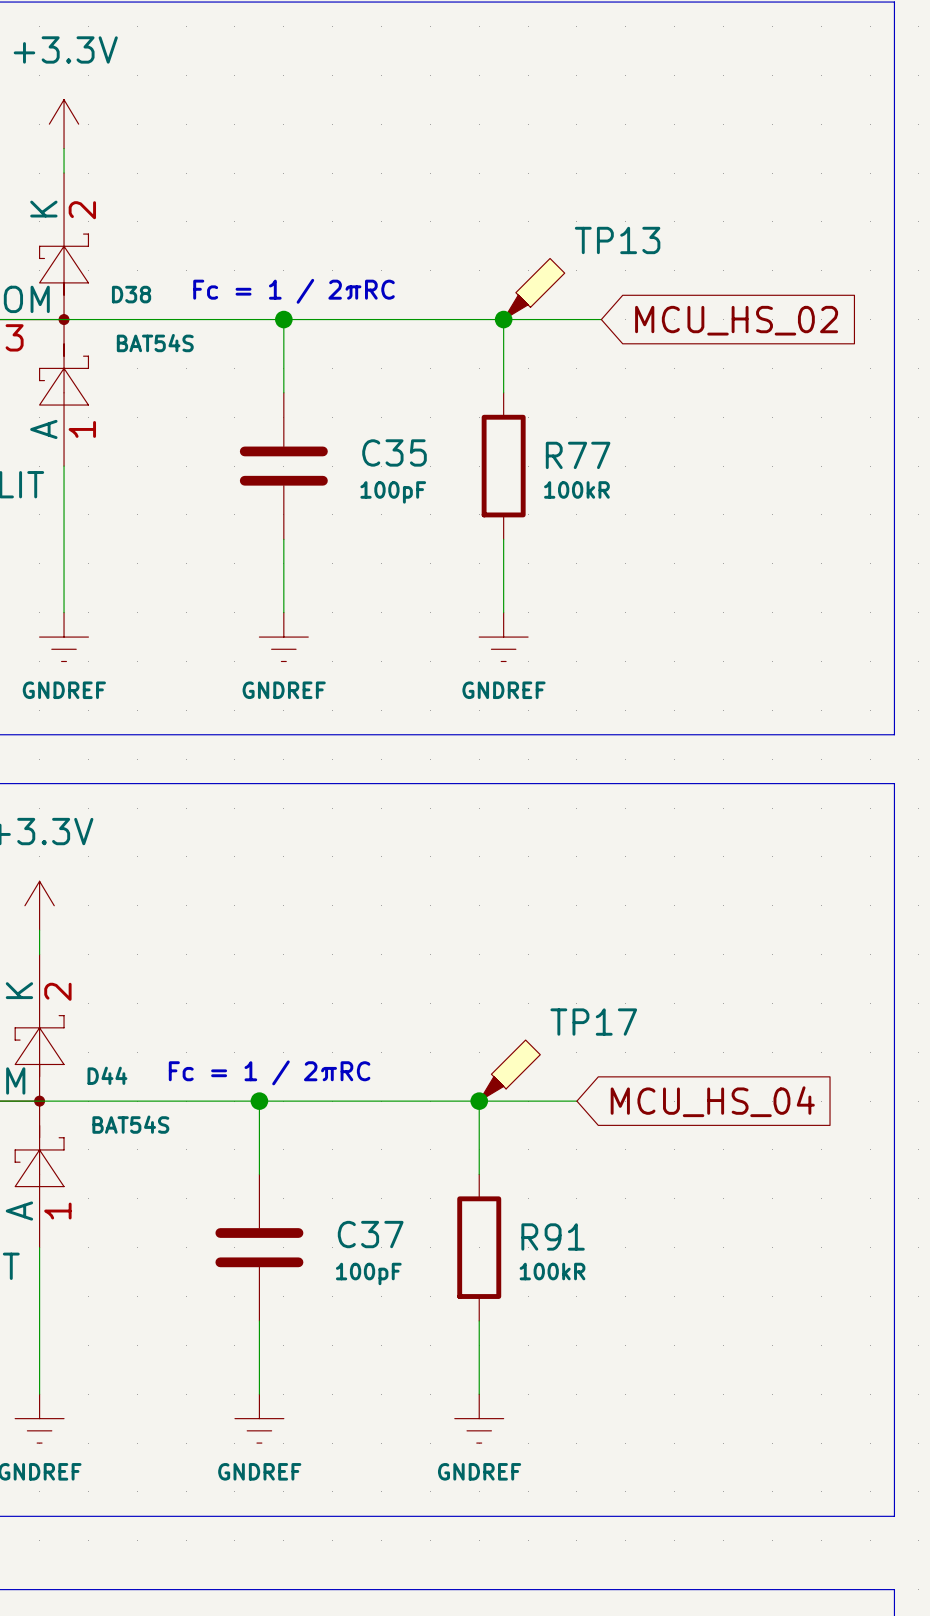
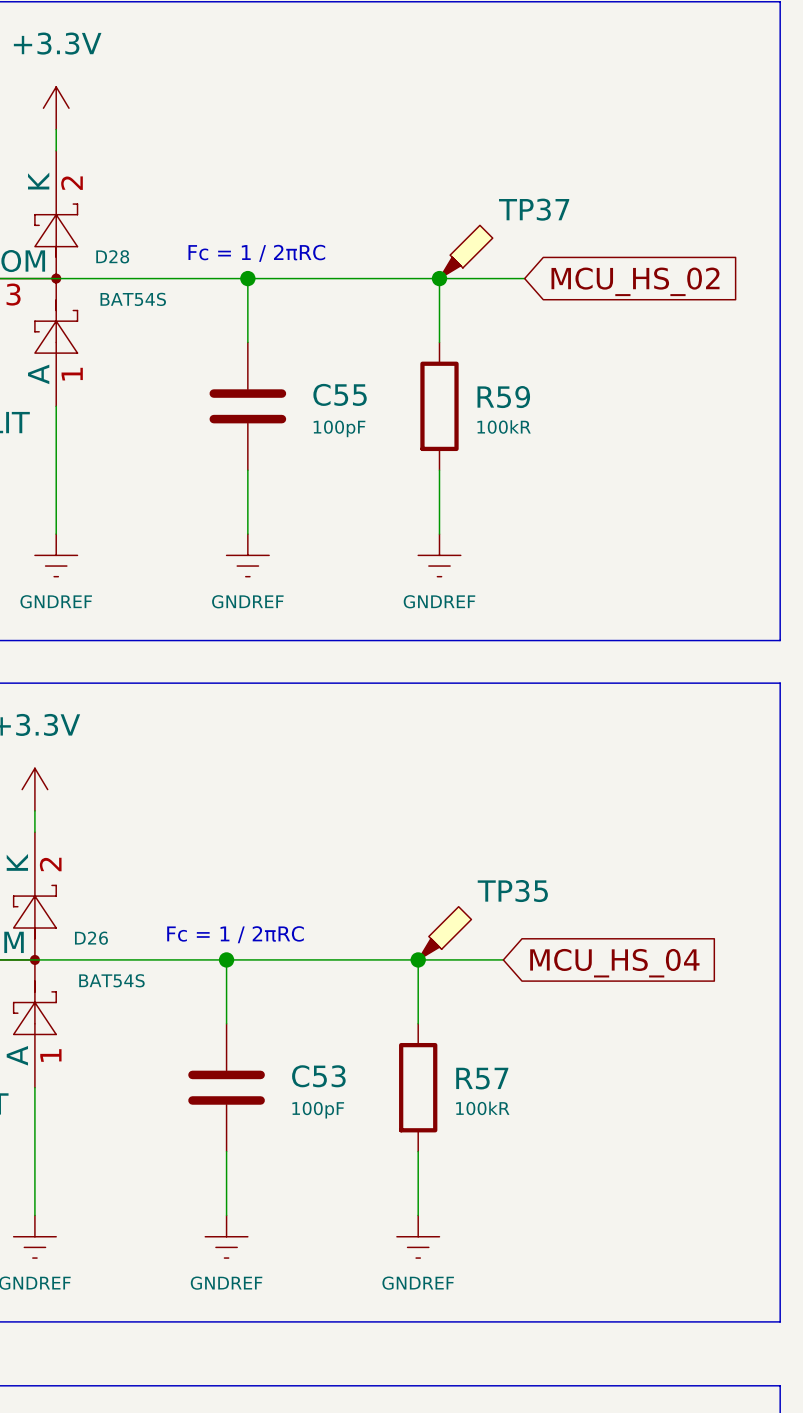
TP13 name: TP13 (617, 240) -> TP37 (534, 209)
D38 name: D38 (131, 294) -> D28 (112, 256)
C35 name: C35 (394, 452) -> C55 (340, 394)
R77 name: R77 (578, 455) -> R59 (503, 397)
TP17 name: TP17 (593, 1022) -> TP35 (512, 891)
D44 name: D44 (107, 1075) -> D26 (91, 938)
C37 name: C37 (370, 1234) -> C53 (318, 1076)
R91 name: R91 (553, 1236) -> R57 (482, 1078)

